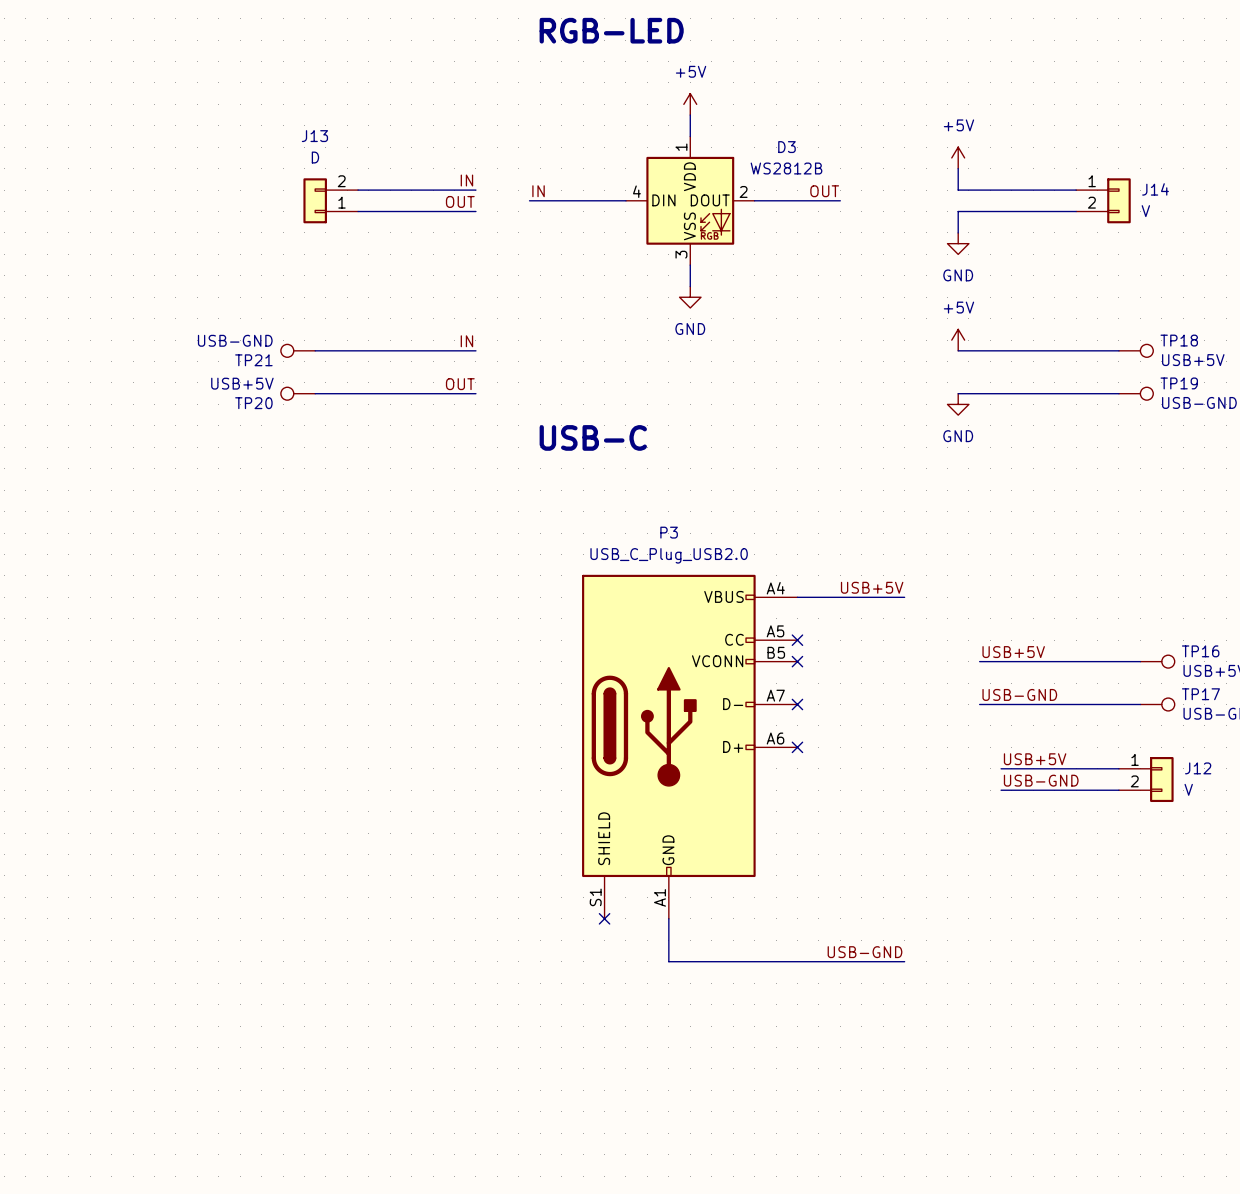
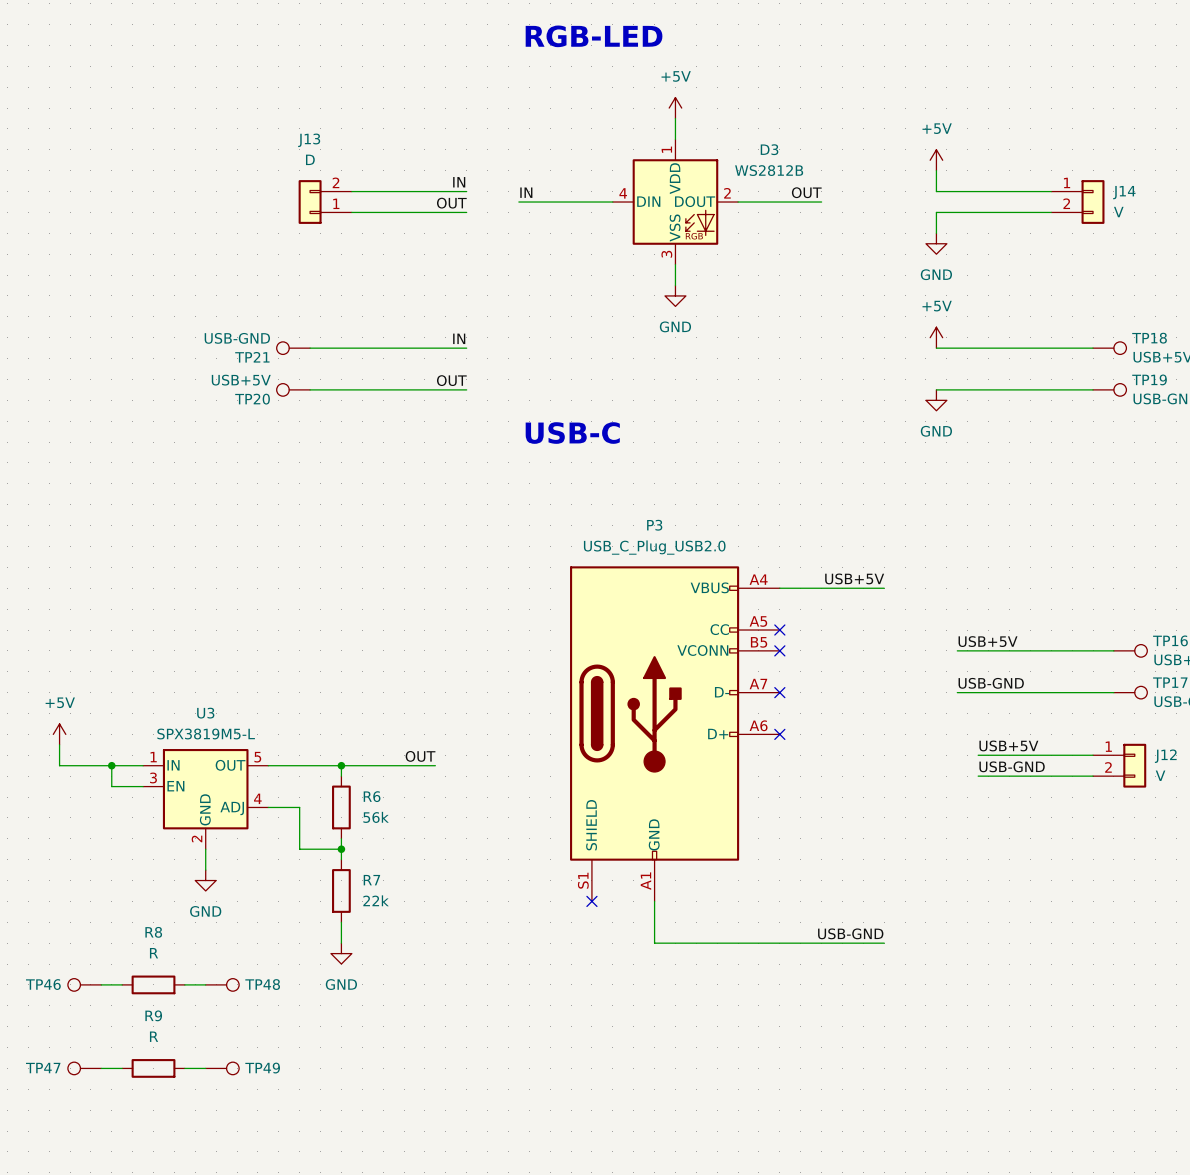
power symbol: none -> +5V (59, 734)
wire: none -> (59, 744) (59, 765) (143, 765)
label: none -> OUT (420, 756)
wire: none -> (111, 765) (111, 786) (143, 786)
junction: none -> (111, 765)
wire: none -> (268, 765) (435, 765)
wire: none -> (341, 765) (341, 776)
junction: none -> (341, 765)
U3: none -> SPX3819M5-L (205, 799)
wire: none -> (268, 807) (299, 807) (299, 849) (341, 849)
R6: none -> 56k (341, 807)
wire: none -> (341, 838) (341, 859)
wire: none -> (205, 849) (205, 870)
junction: none -> (341, 849)
power symbol: none -> GND (205, 880)
R7: none -> 22k (341, 890)
wire: none -> (341, 922) (341, 943)
power symbol: none -> GND (341, 953)
TP46: none -> (84, 984)
wire: none -> (101, 984) (122, 984)
R8: none -> R (153, 984)
wire: none -> (184, 984) (205, 984)
TP48: none -> (222, 984)
TP47: none -> (84, 1068)
wire: none -> (101, 1068) (122, 1068)
R9: none -> R (153, 1068)
wire: none -> (184, 1068) (205, 1068)
TP49: none -> (222, 1068)

